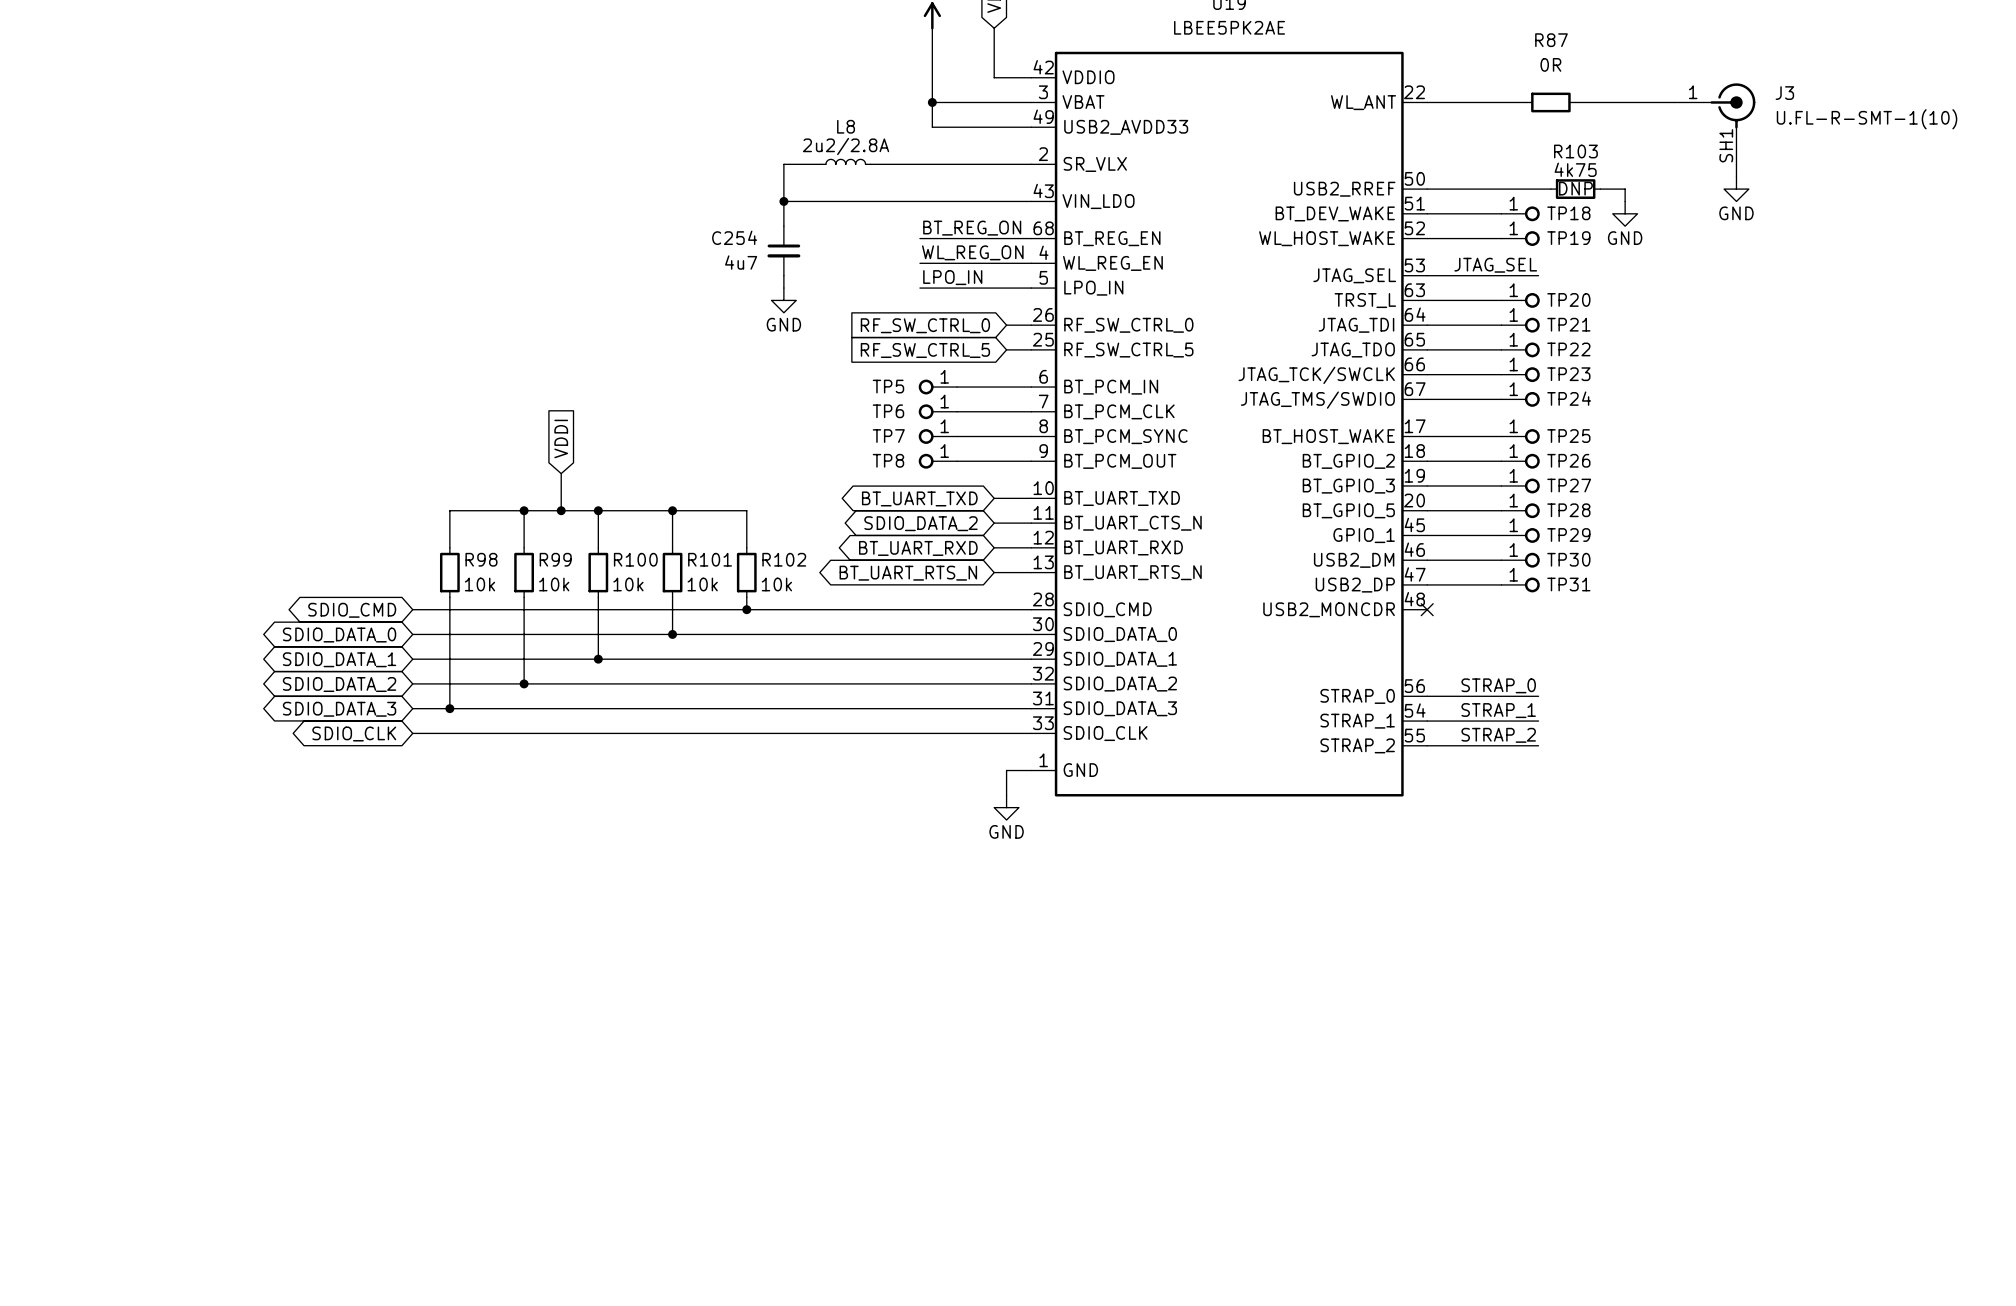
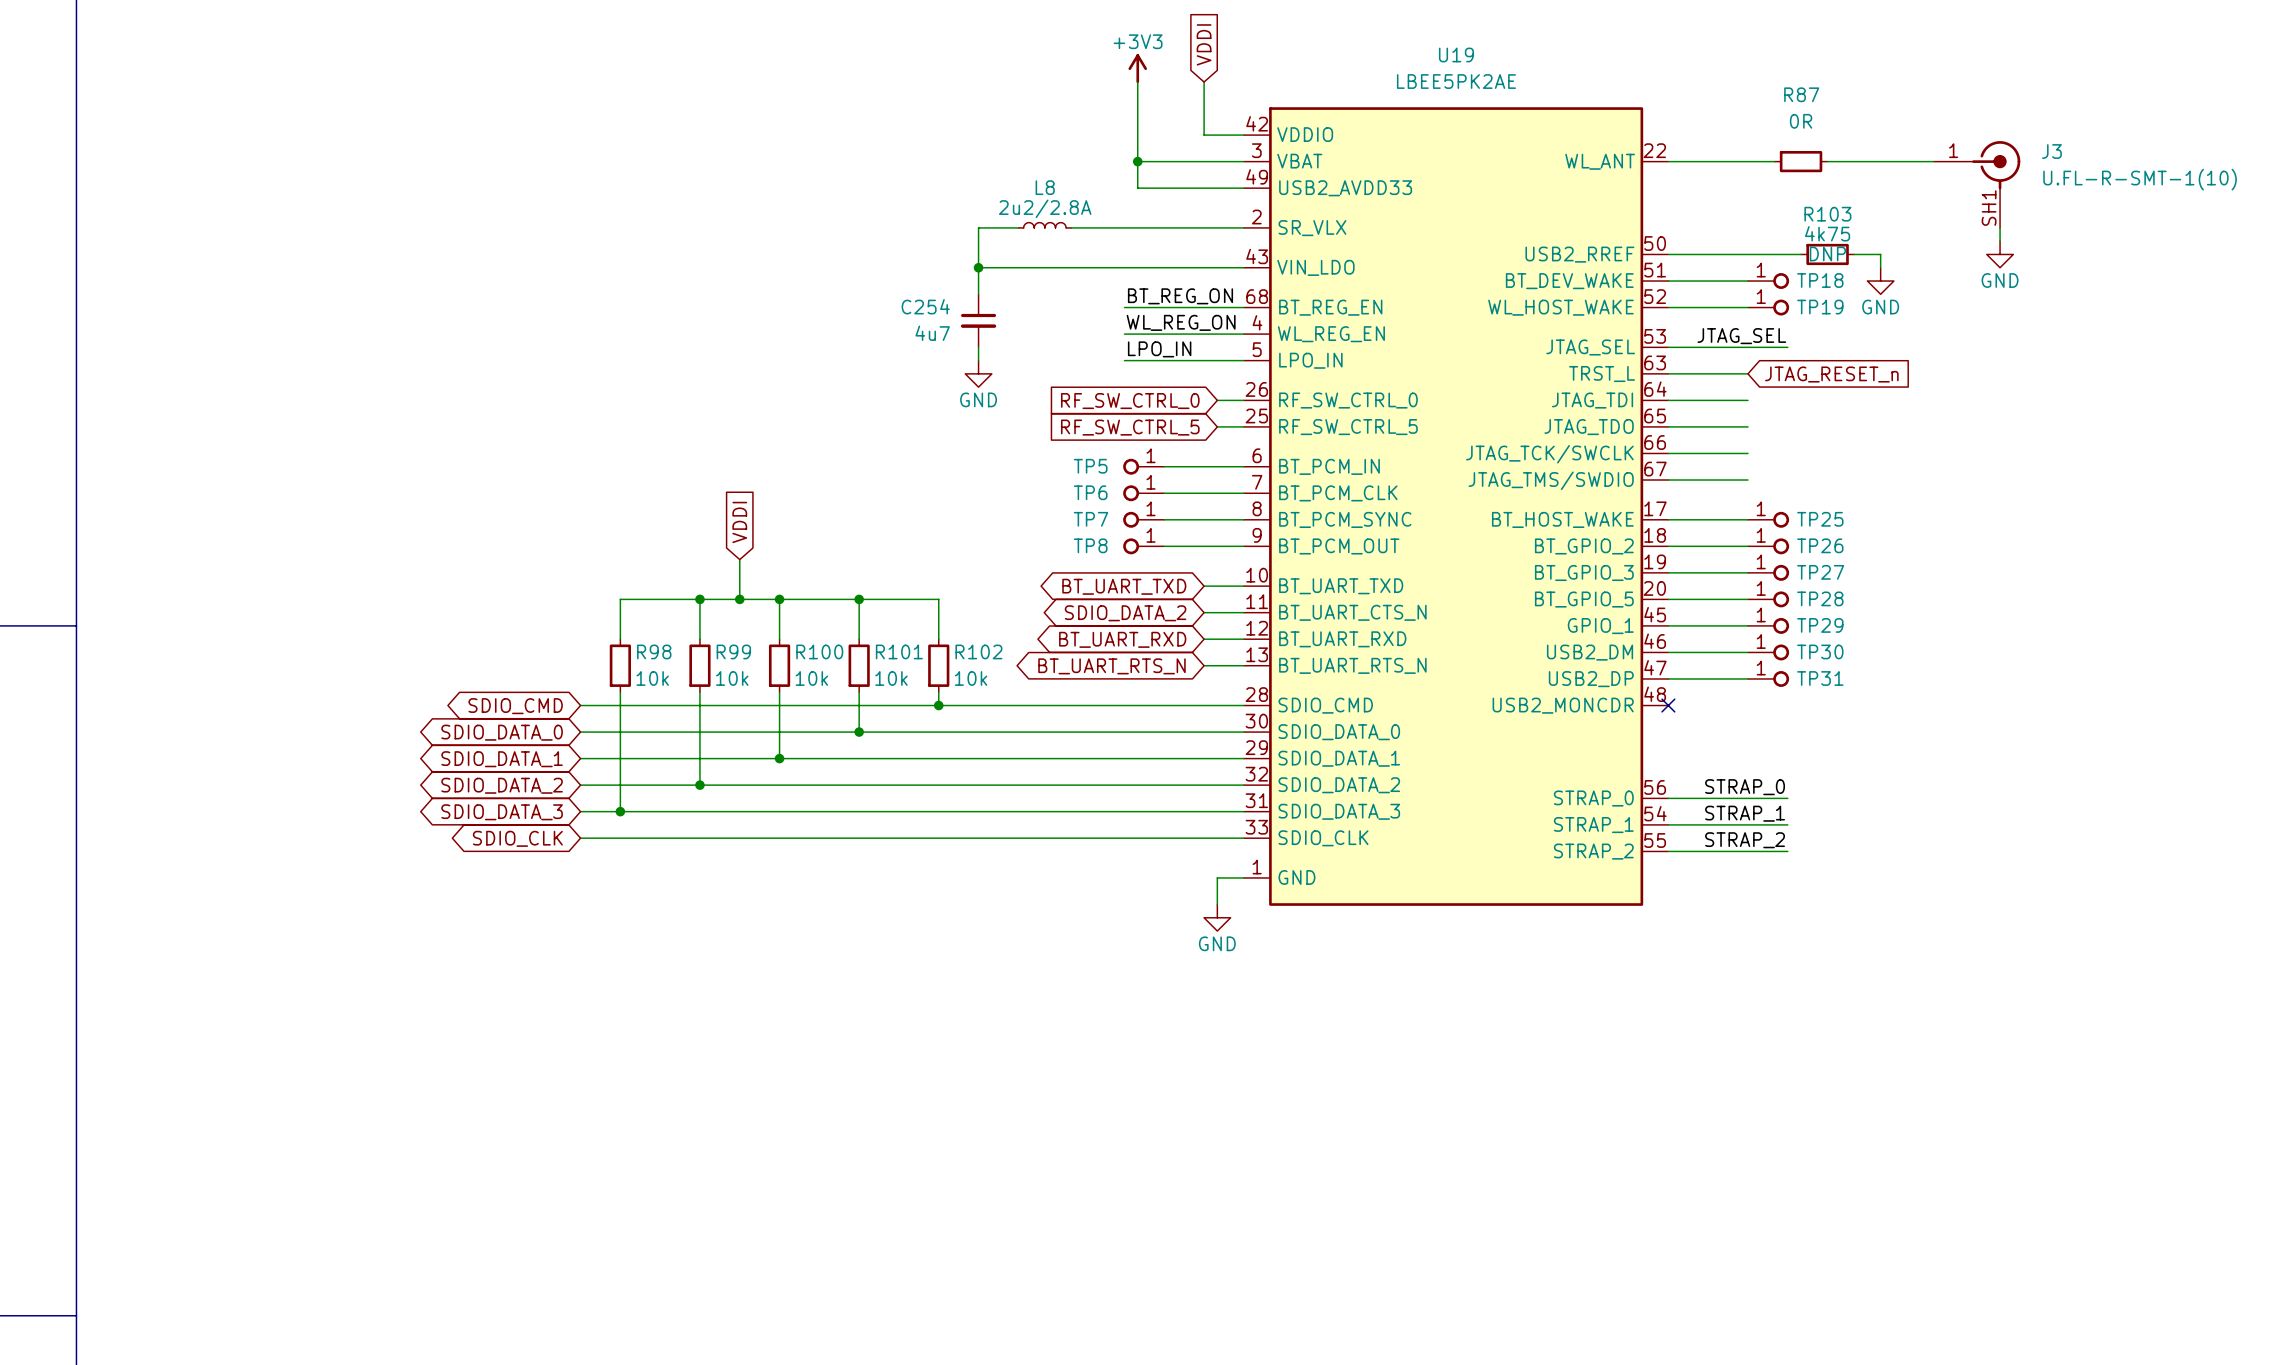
TP20: (1520, 300) -> none
global label: none -> JTAG_RESET_n (1831, 374)
TP21: (1520, 325) -> none
TP22: (1520, 349) -> none
TP23: (1520, 374) -> none
TP24: (1520, 399) -> none

